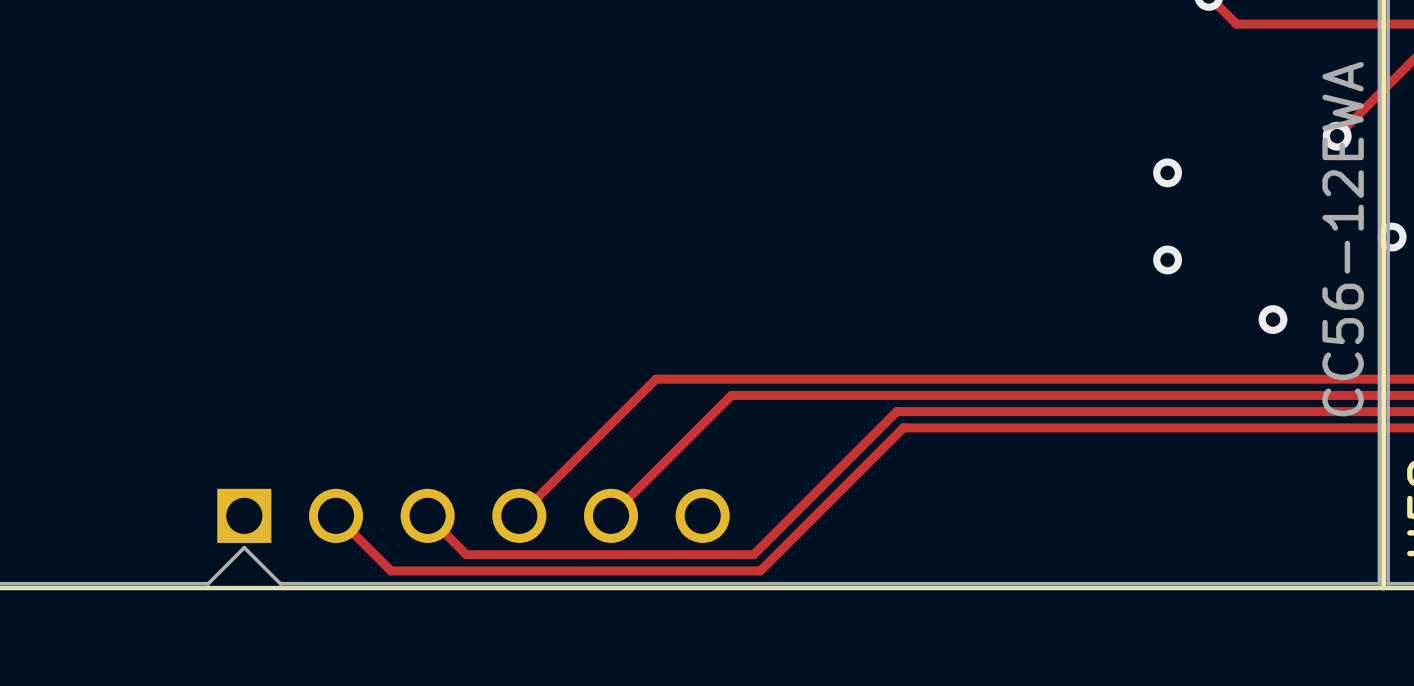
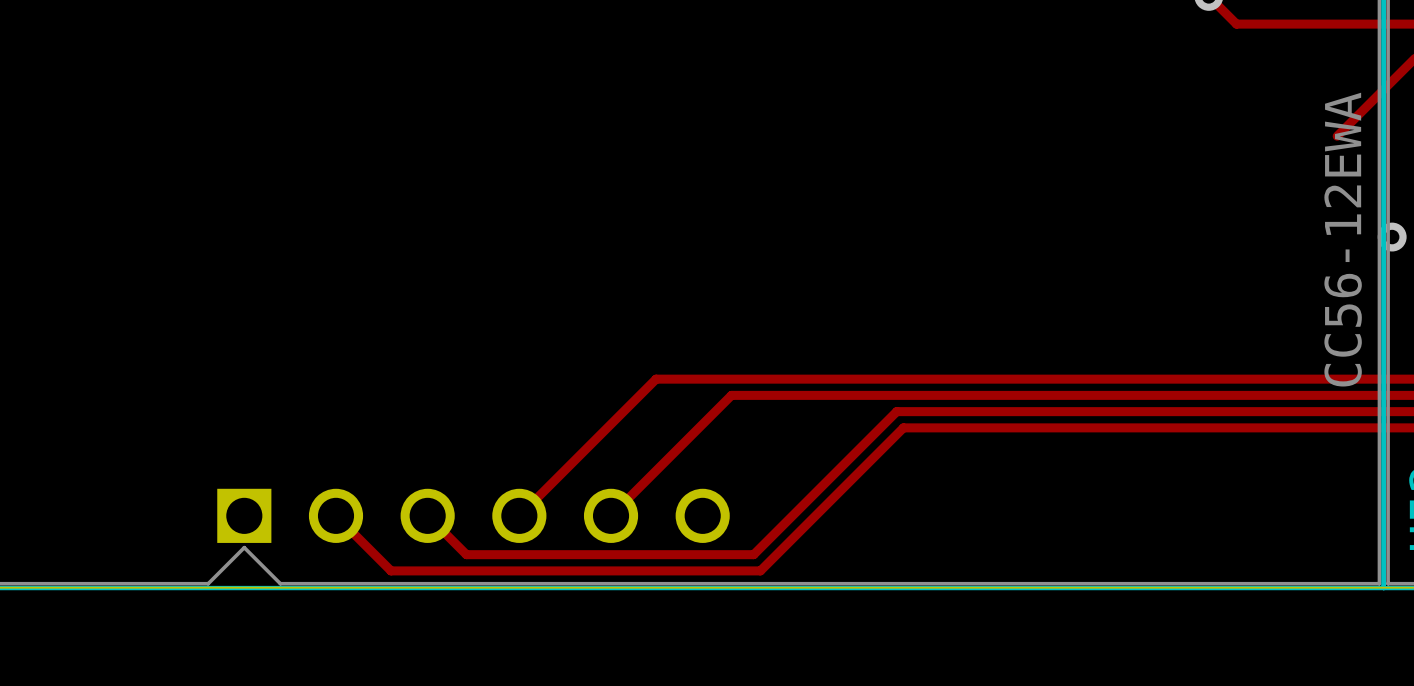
via: (1337, 136) -> none
via: (1167, 172) -> none
via: (1167, 259) -> none
via: (1273, 319) -> none

